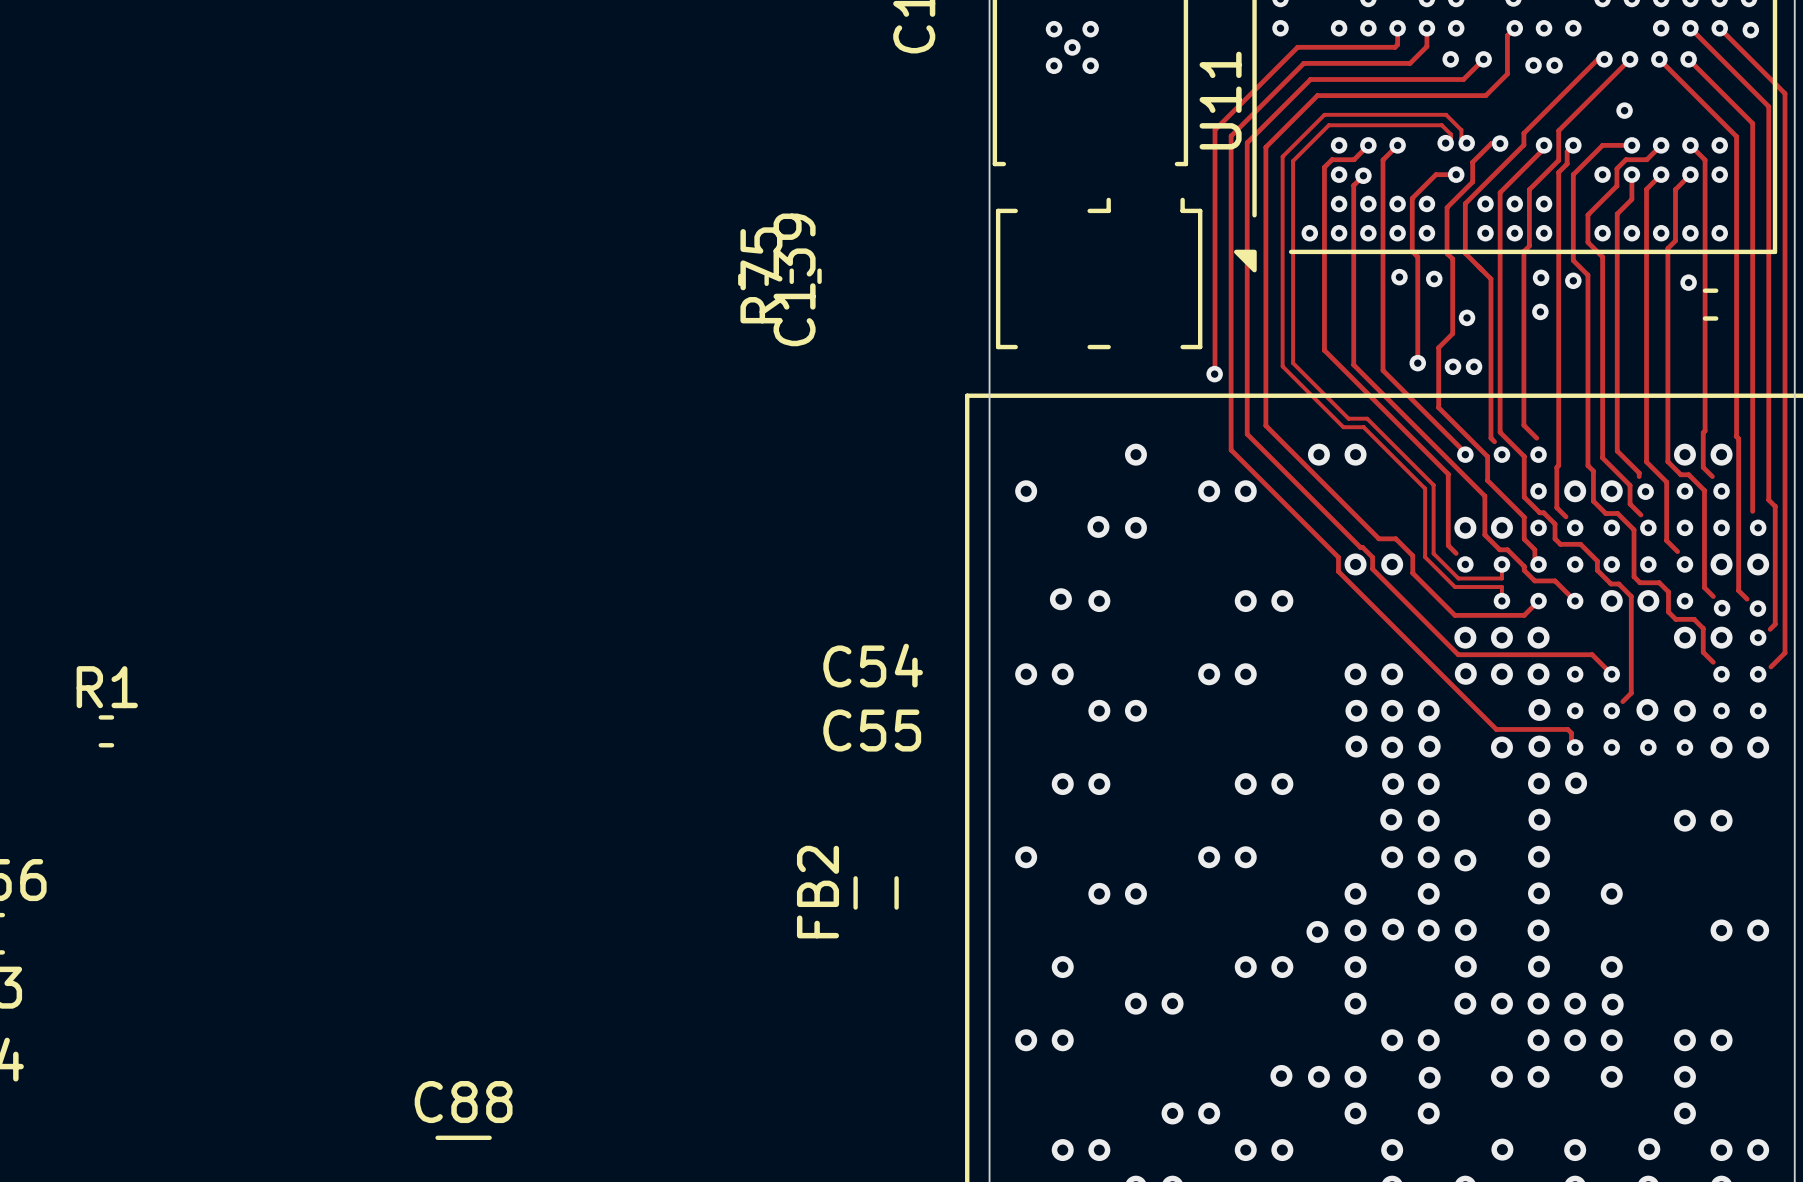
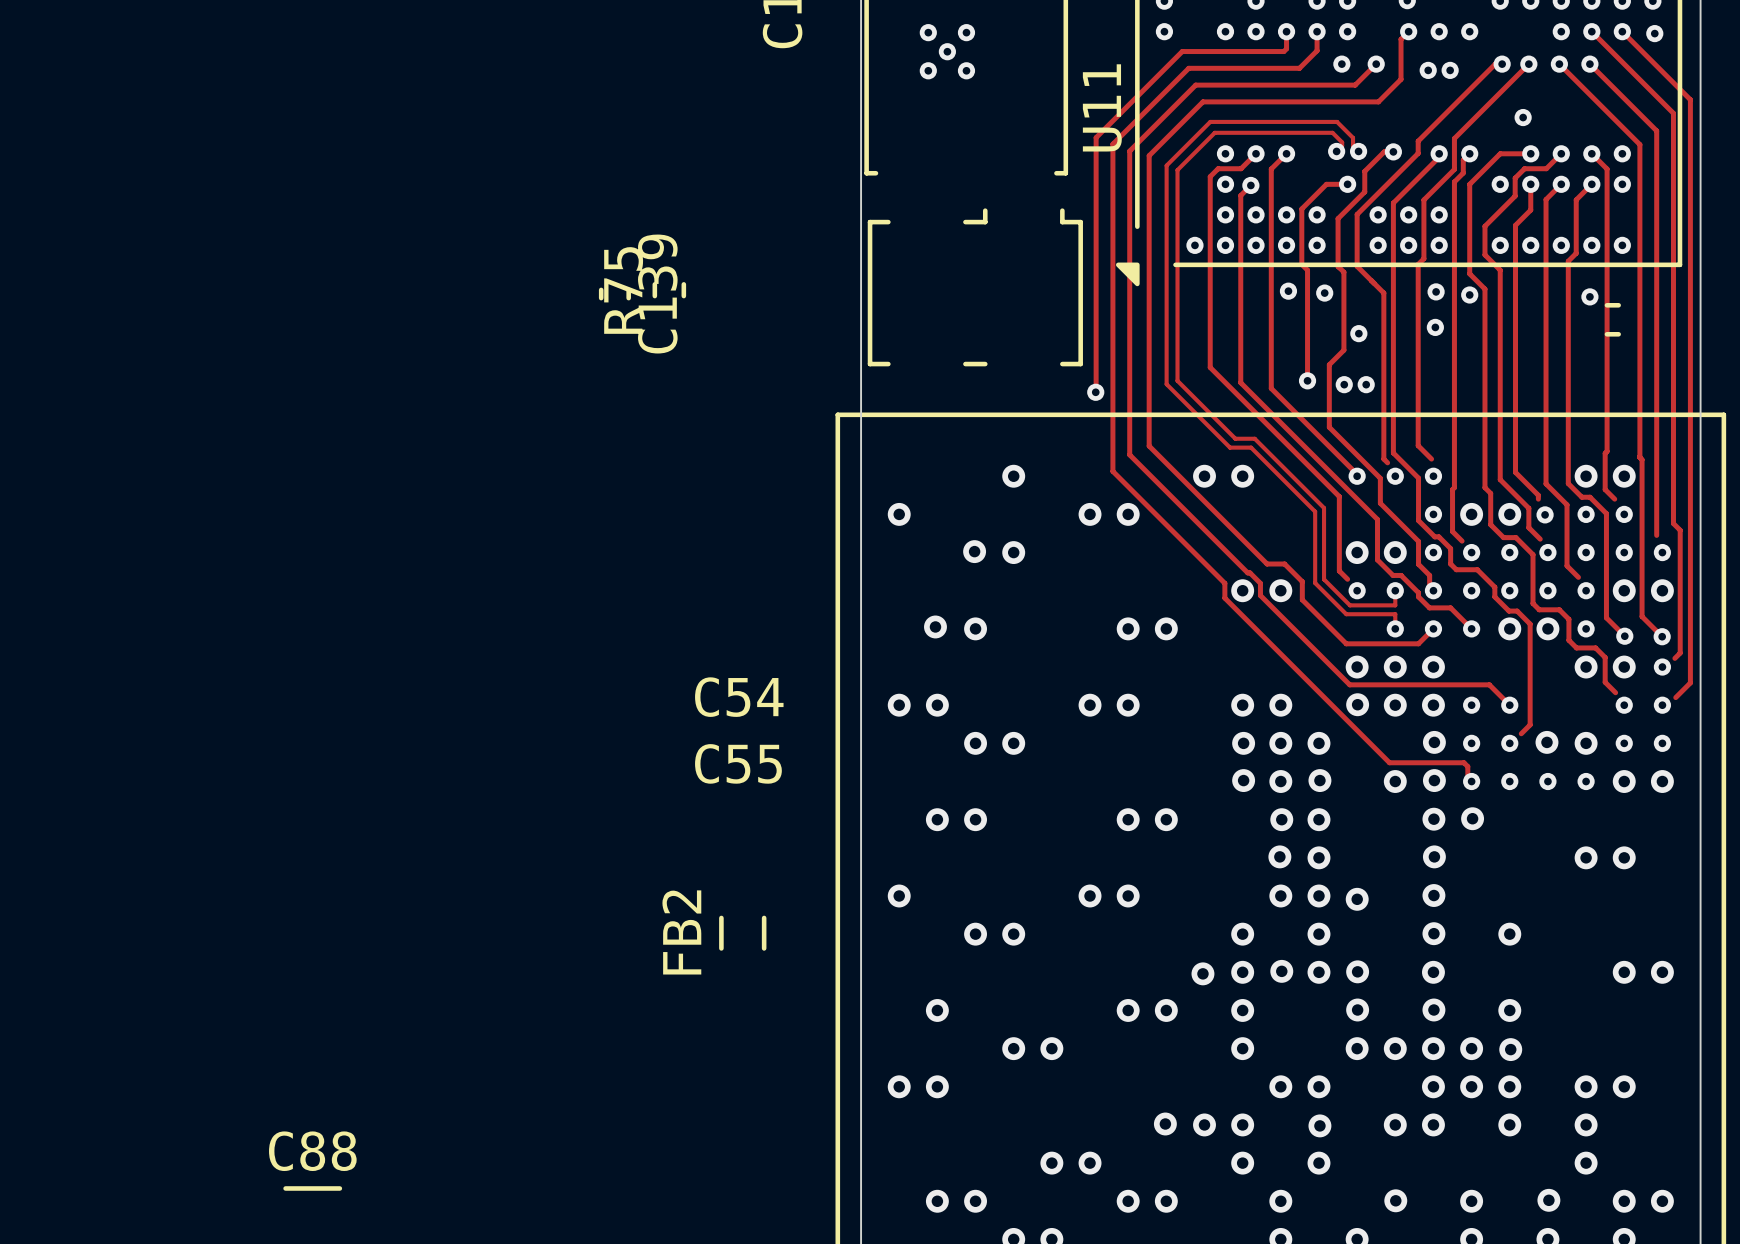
track: (1704, 587) (1713, 596) -> (1606, 614) (1606, 617) (1624, 636)
track: (1738, 589) (1747, 599) -> (1642, 616) (1662, 636)

